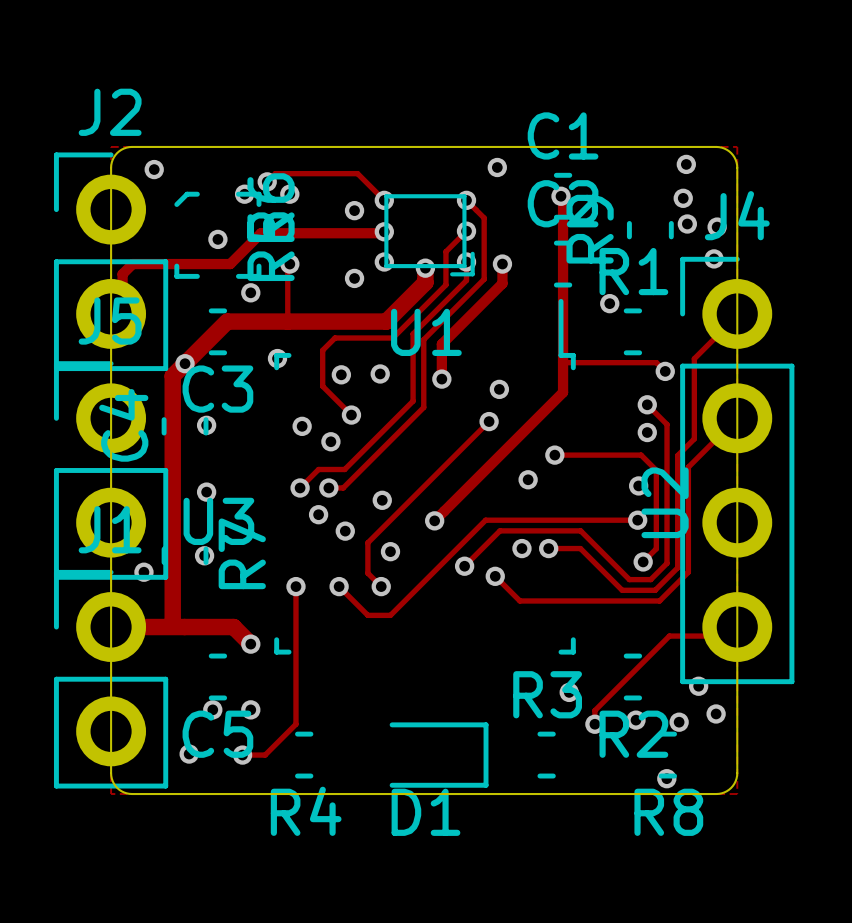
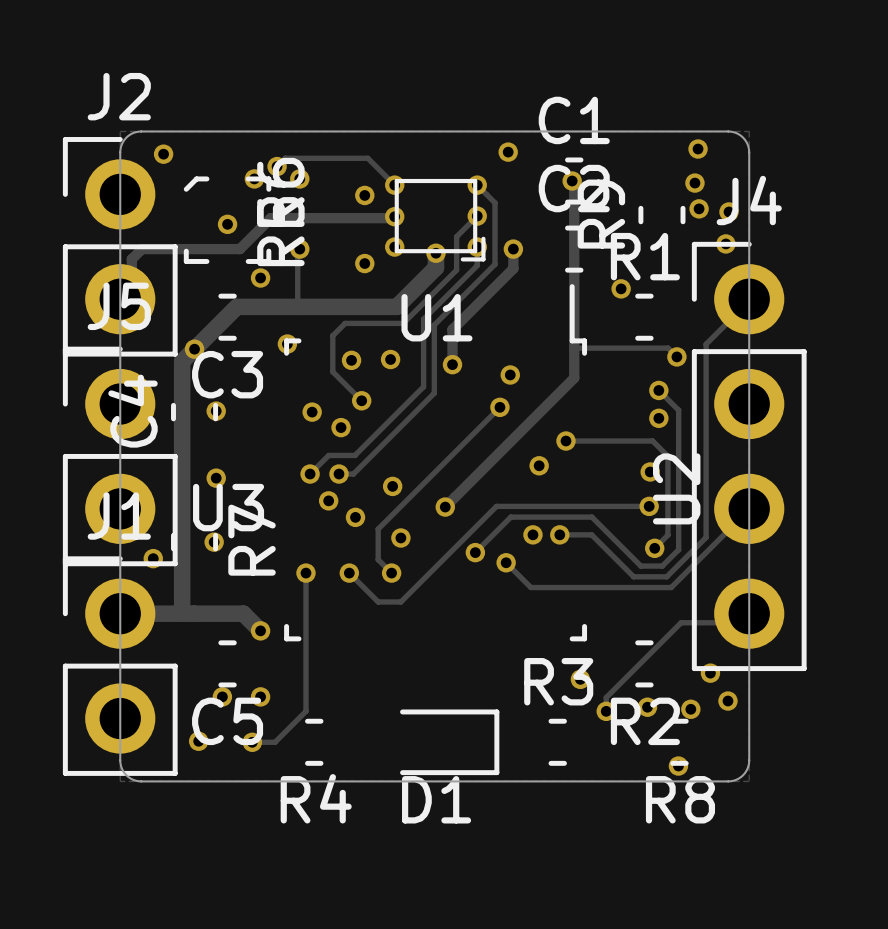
track: (728, 427) (688, 467) (688, 572) -> (740, 518) (700, 558)
track: (694, 438) (677, 455) (677, 567) -> (706, 424) (706, 537) (689, 554)

